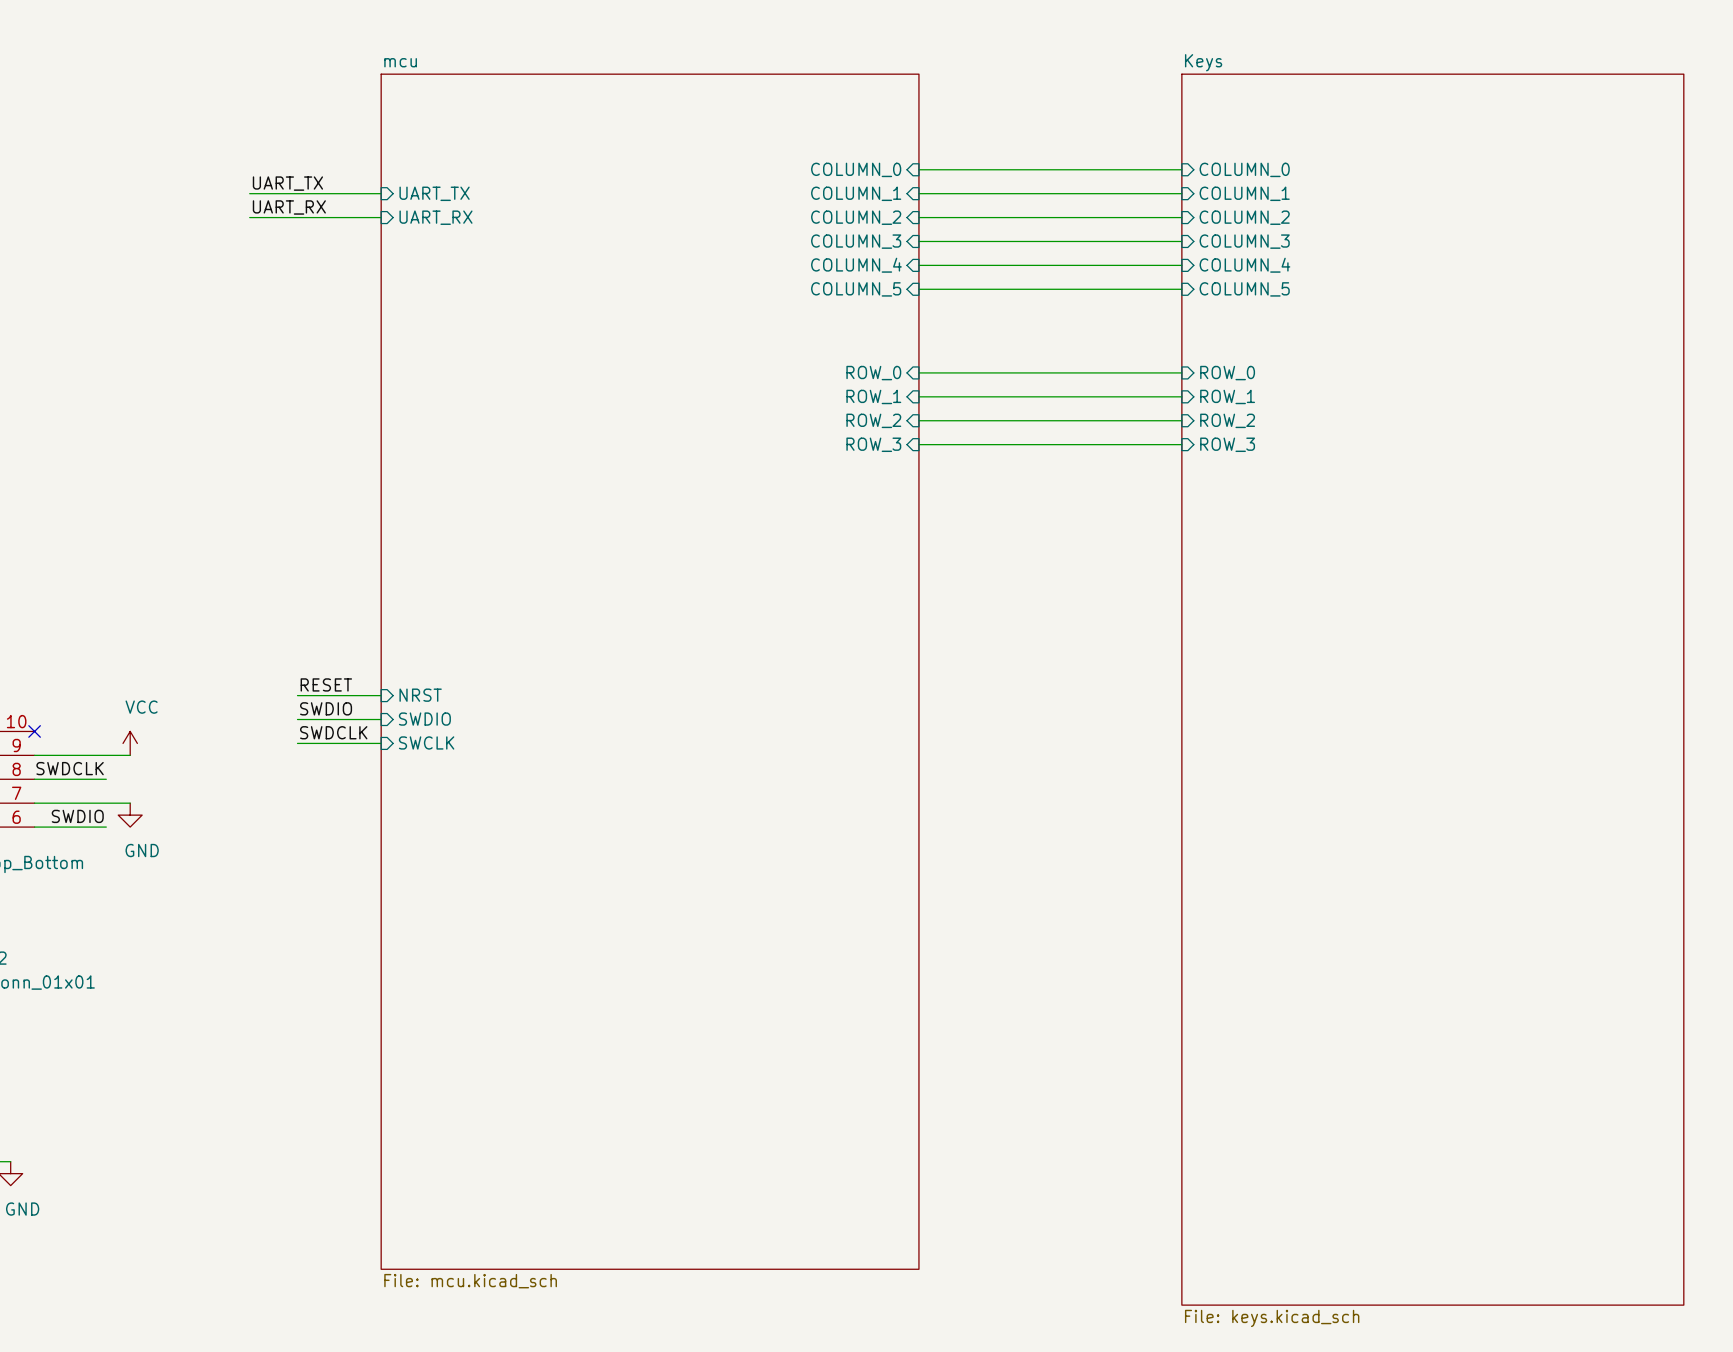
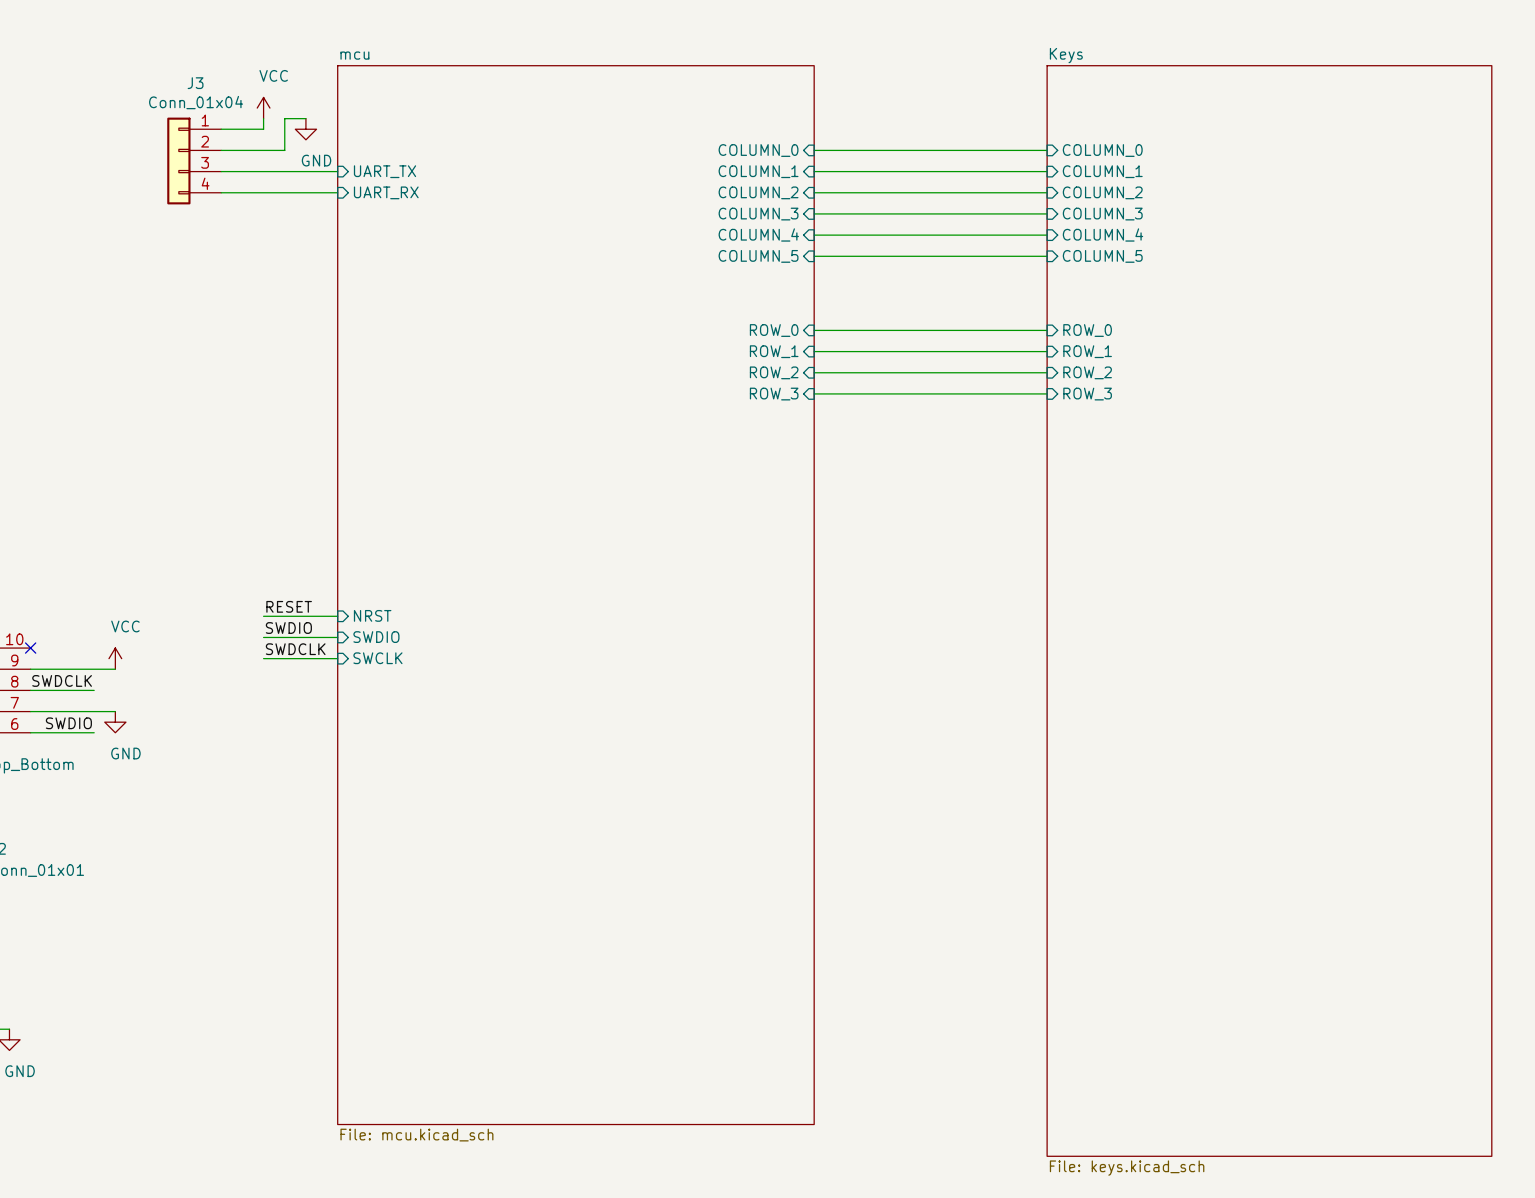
power symbol: none -> VCC (263, 108)
wire: none -> (263, 118) (263, 129) (221, 129)
wire: none -> (305, 118) (284, 118) (284, 150) (221, 150)
power symbol: none -> GND (305, 129)
J3: none -> Conn_01x04 (194, 161)
label: UART_TX (287, 183) -> none
label: UART_RX (289, 207) -> none

